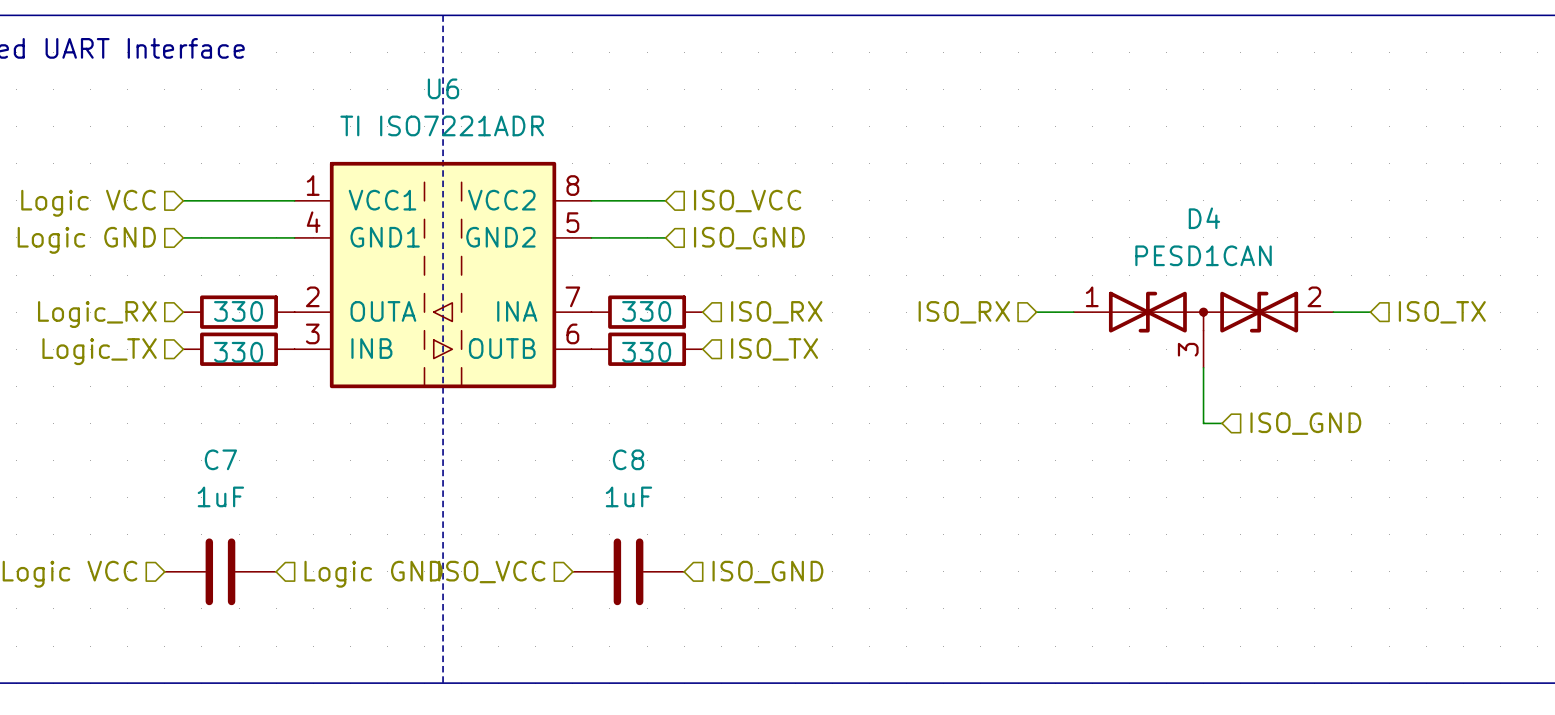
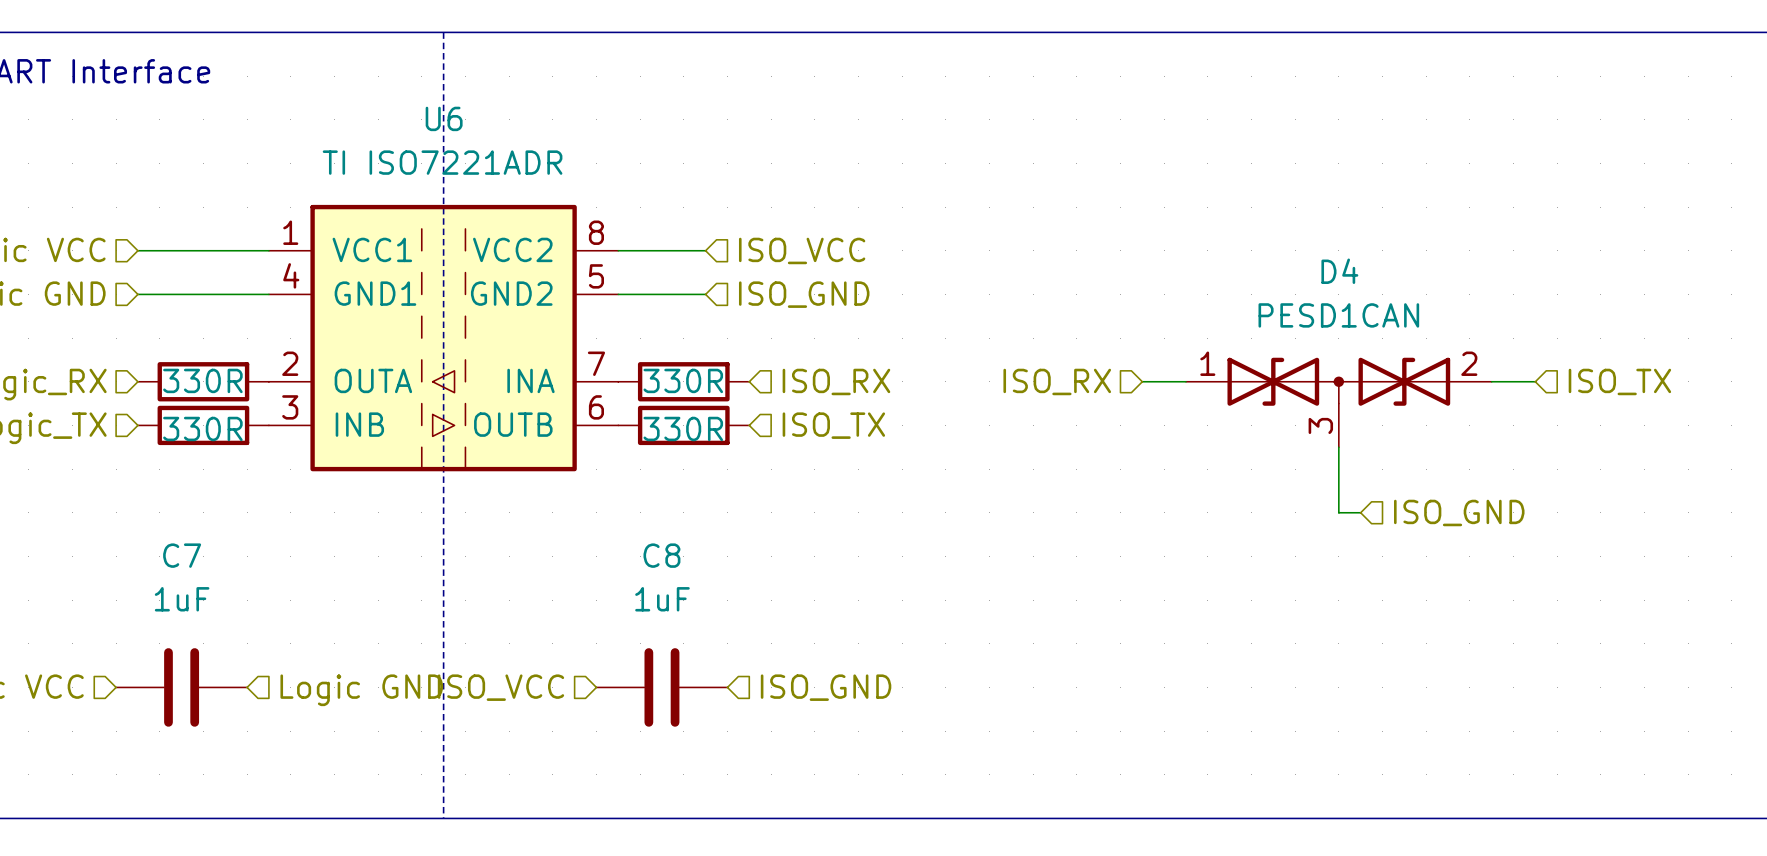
part value: 330 (238, 311) -> 330R (202, 380)
part value: 330 (646, 311) -> 330R (683, 380)
part value: 330 (238, 352) -> 330R (202, 428)
part value: 330 (646, 352) -> 330R (683, 428)

